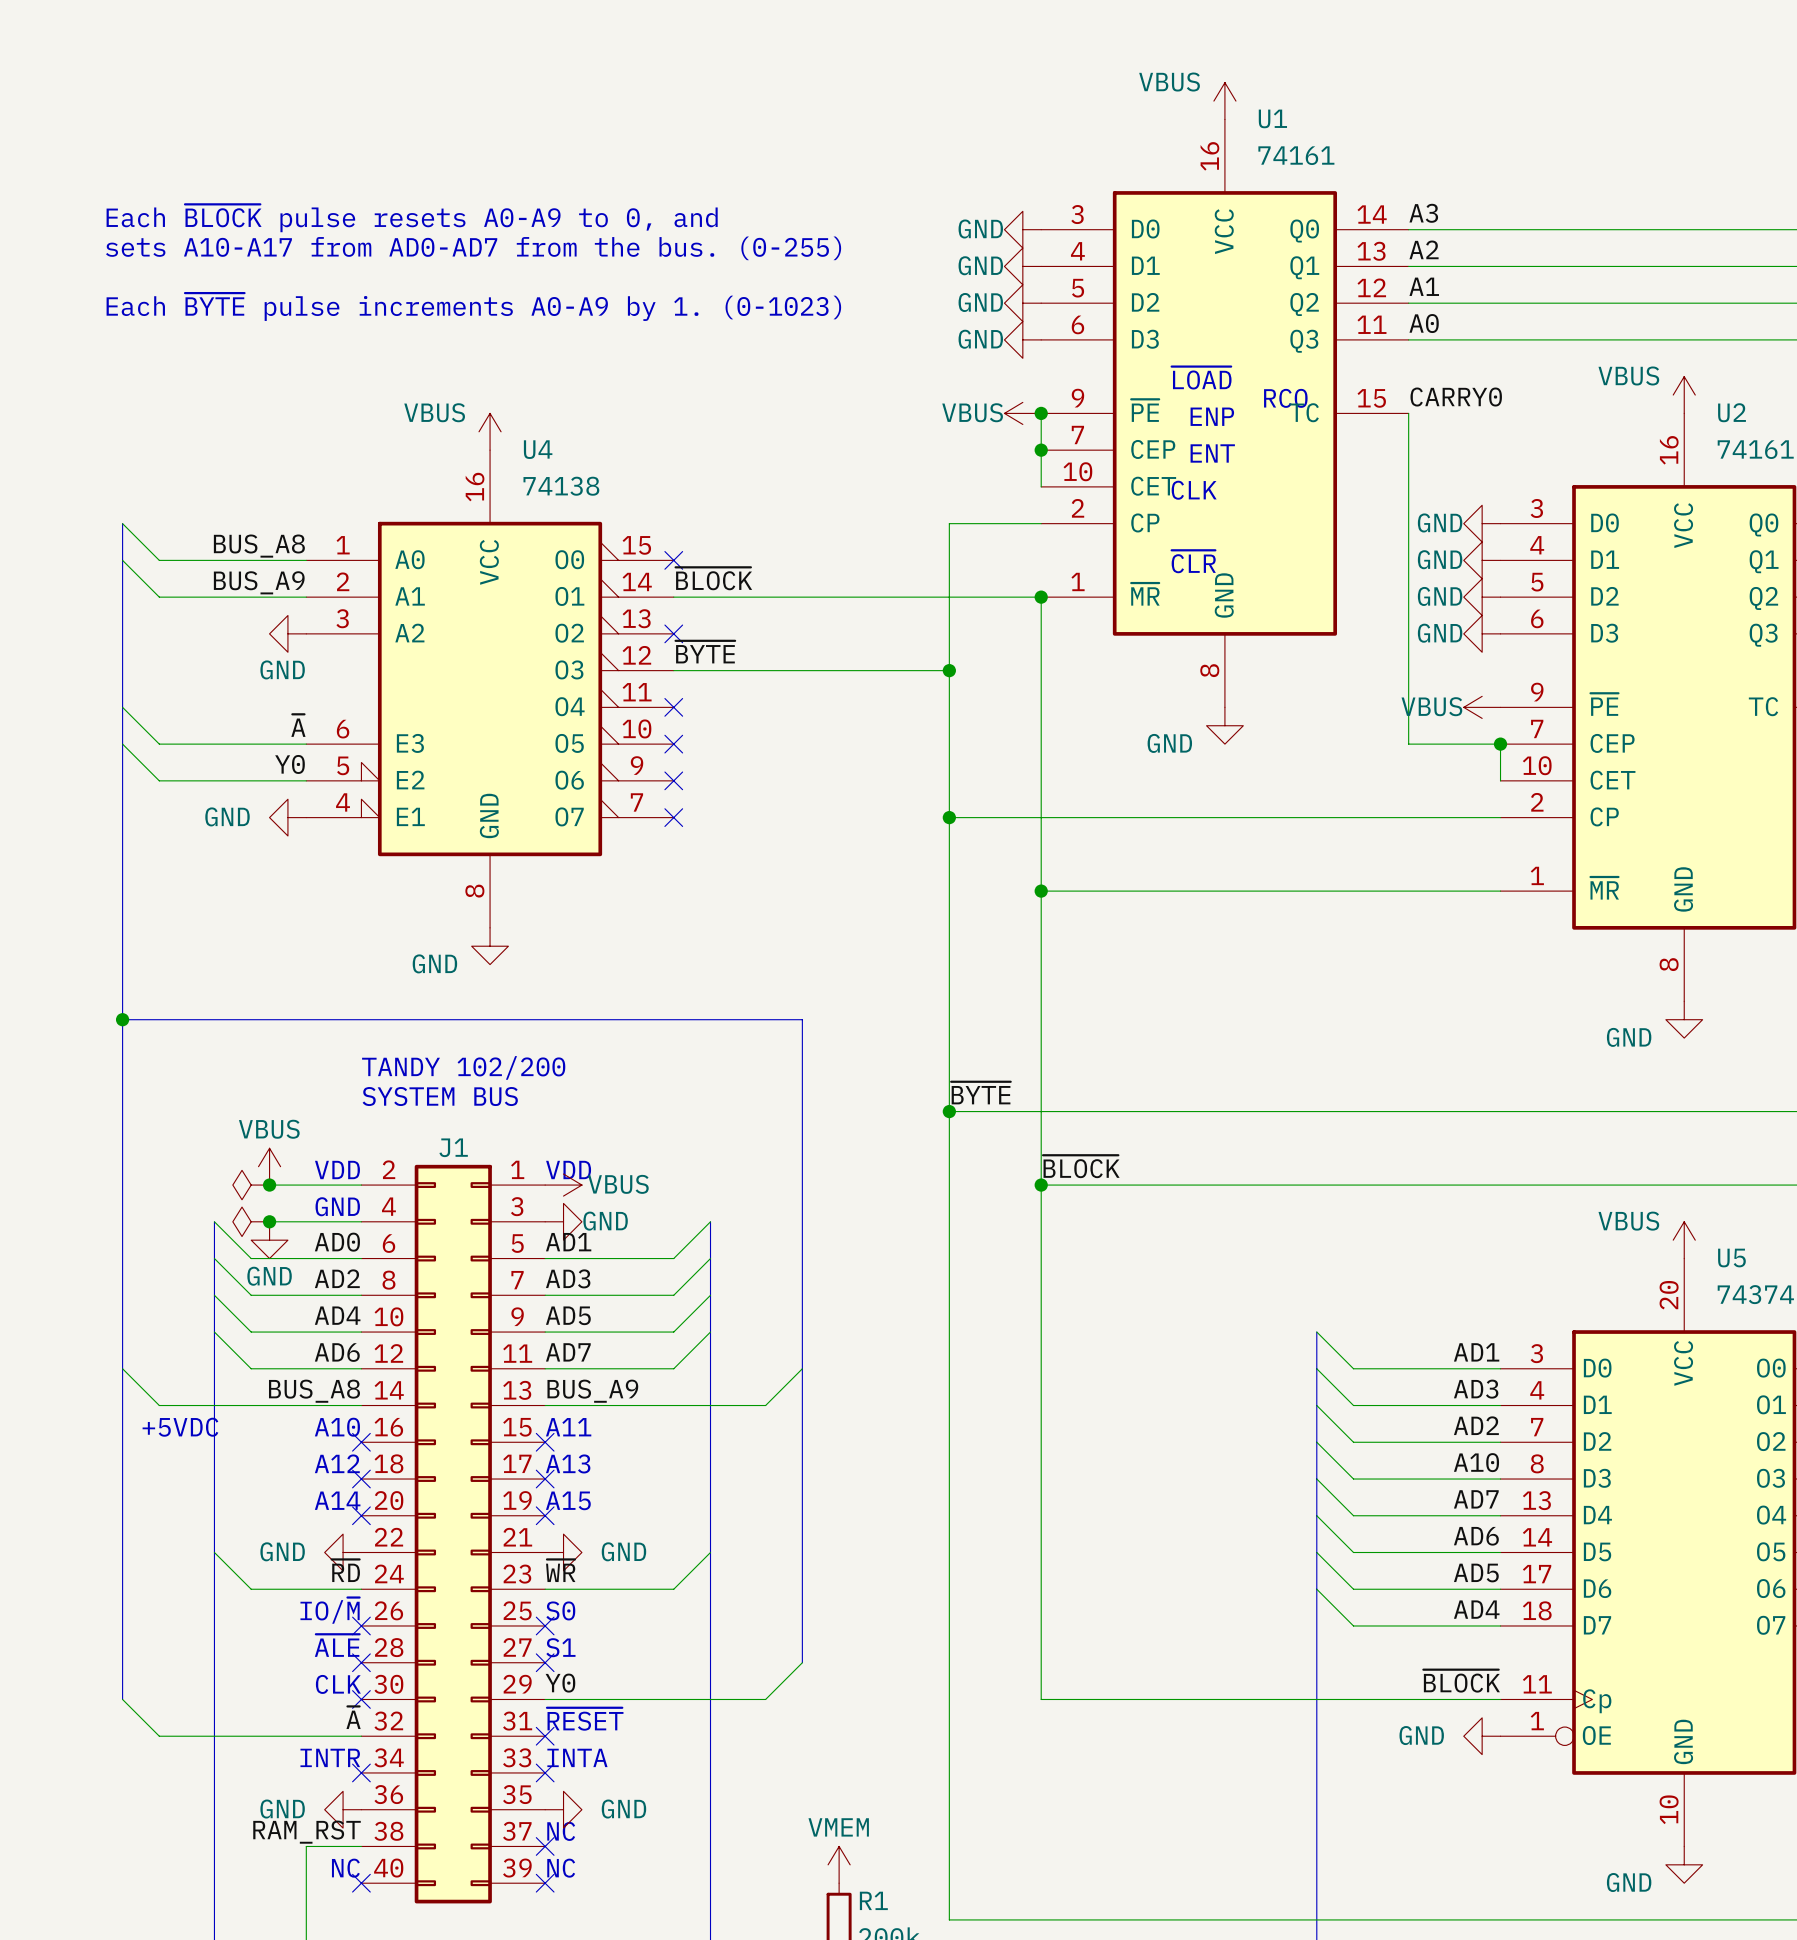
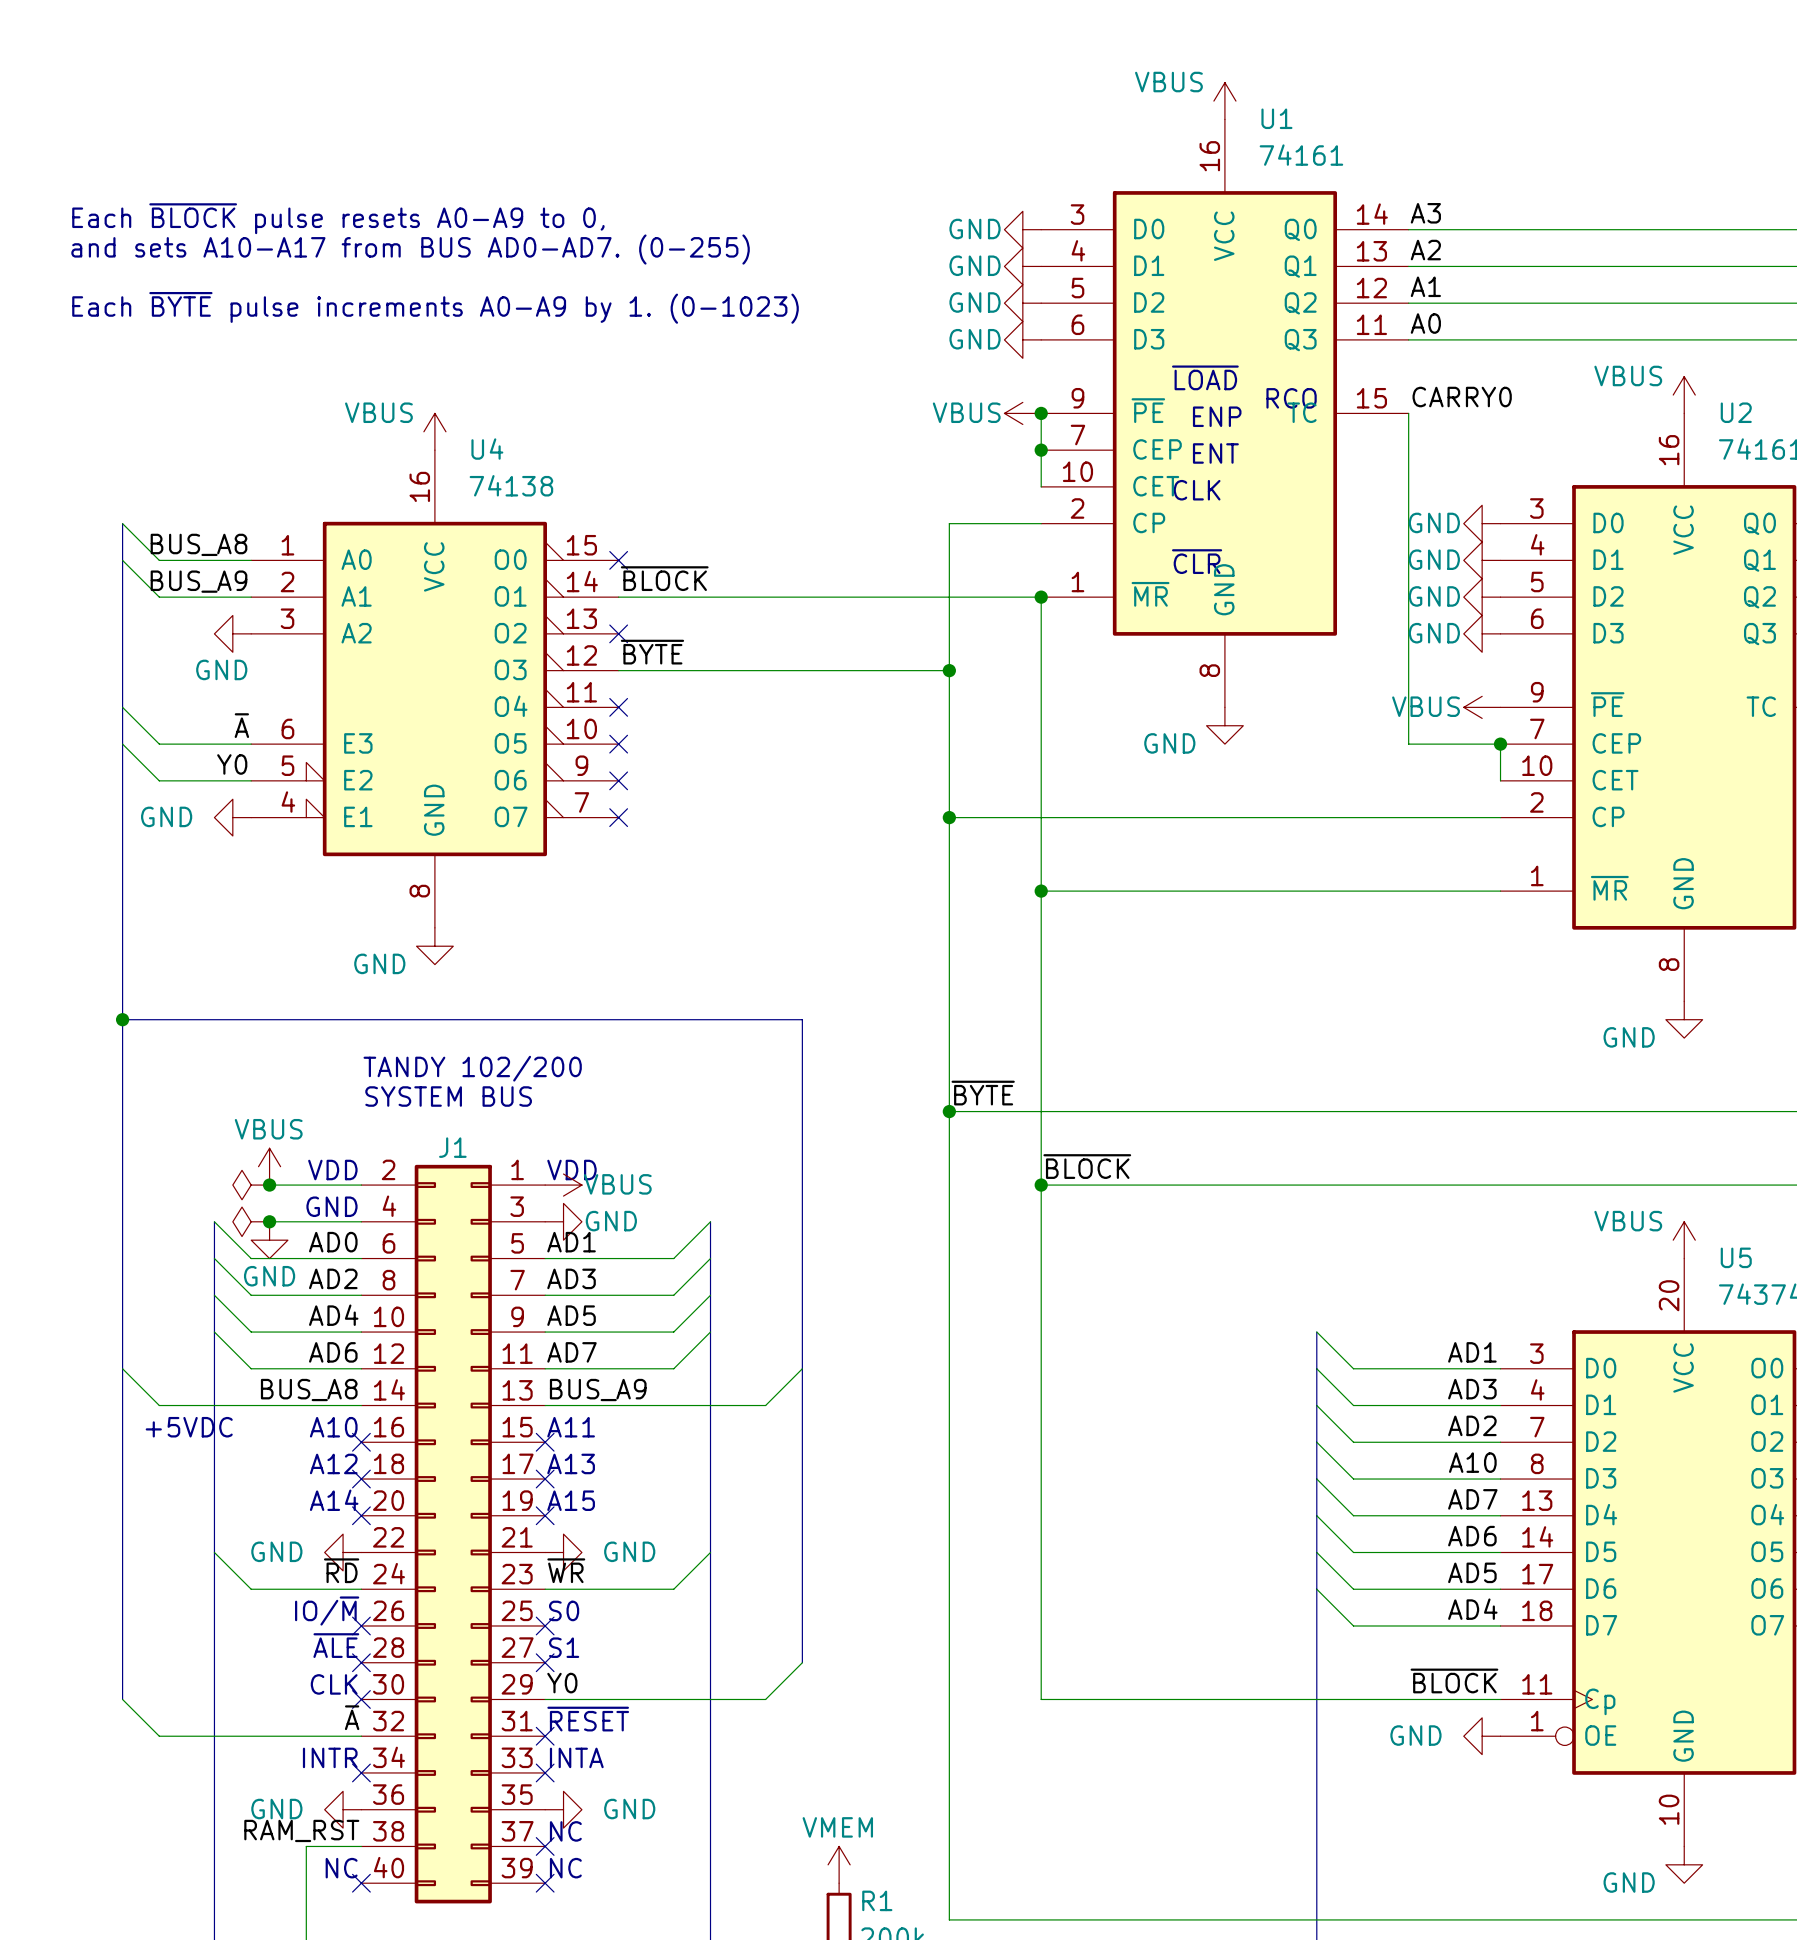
text: Each ~{BLOCK} pulse resets A0-A9 to 0, and (412, 218) -> Each ~{BLOCK} pulse resets A0-A9 to 0, (338, 218)
text: sets A10-A17 from AD0-AD7 from the bus. (0-255) (473, 248) -> and sets A10-A17 from BUS AD0-AD7. (0-255) (410, 249)
text position: Each ~{BYTE} pulse increments A0-A9 by 1. (0-1023) (473, 307) -> Each ~{BYTE} pulse increments A0-A9 by 1. (0-1023) (435, 307)
power symbol position: VBUS (490, 431) -> VBUS (434, 431)
label position: BUS_A8 (259, 546) -> BUS_A8 (199, 544)
no-connect mark: none -> (618, 560)
no-connect mark: (673, 560) -> none
label position: ~{BLOCK} (713, 578) -> ~{BLOCK} (664, 578)
label position: BUS_A9 (259, 582) -> BUS_A9 (199, 581)
power symbol position: GND (287, 633) -> GND (232, 633)
no-connect mark: none -> (618, 633)
no-connect mark: (673, 633) -> none
label position: ~{BYTE} (705, 652) -> ~{BYTE} (652, 652)
U4 position: (490, 689) -> (434, 689)
no-connect mark: none -> (618, 707)
no-connect mark: (673, 707) -> none
label position: ~{A} (298, 725) -> ~{A} (241, 725)
no-connect mark: none -> (618, 744)
no-connect mark: (673, 744) -> none
label position: Y0 (290, 764) -> Y0 (232, 764)
no-connect mark: none -> (618, 780)
no-connect mark: (673, 780) -> none
power symbol position: GND (287, 817) -> GND (232, 817)
no-connect mark: none -> (618, 817)
no-connect mark: (673, 817) -> none
power symbol position: GND (490, 946) -> GND (434, 946)

